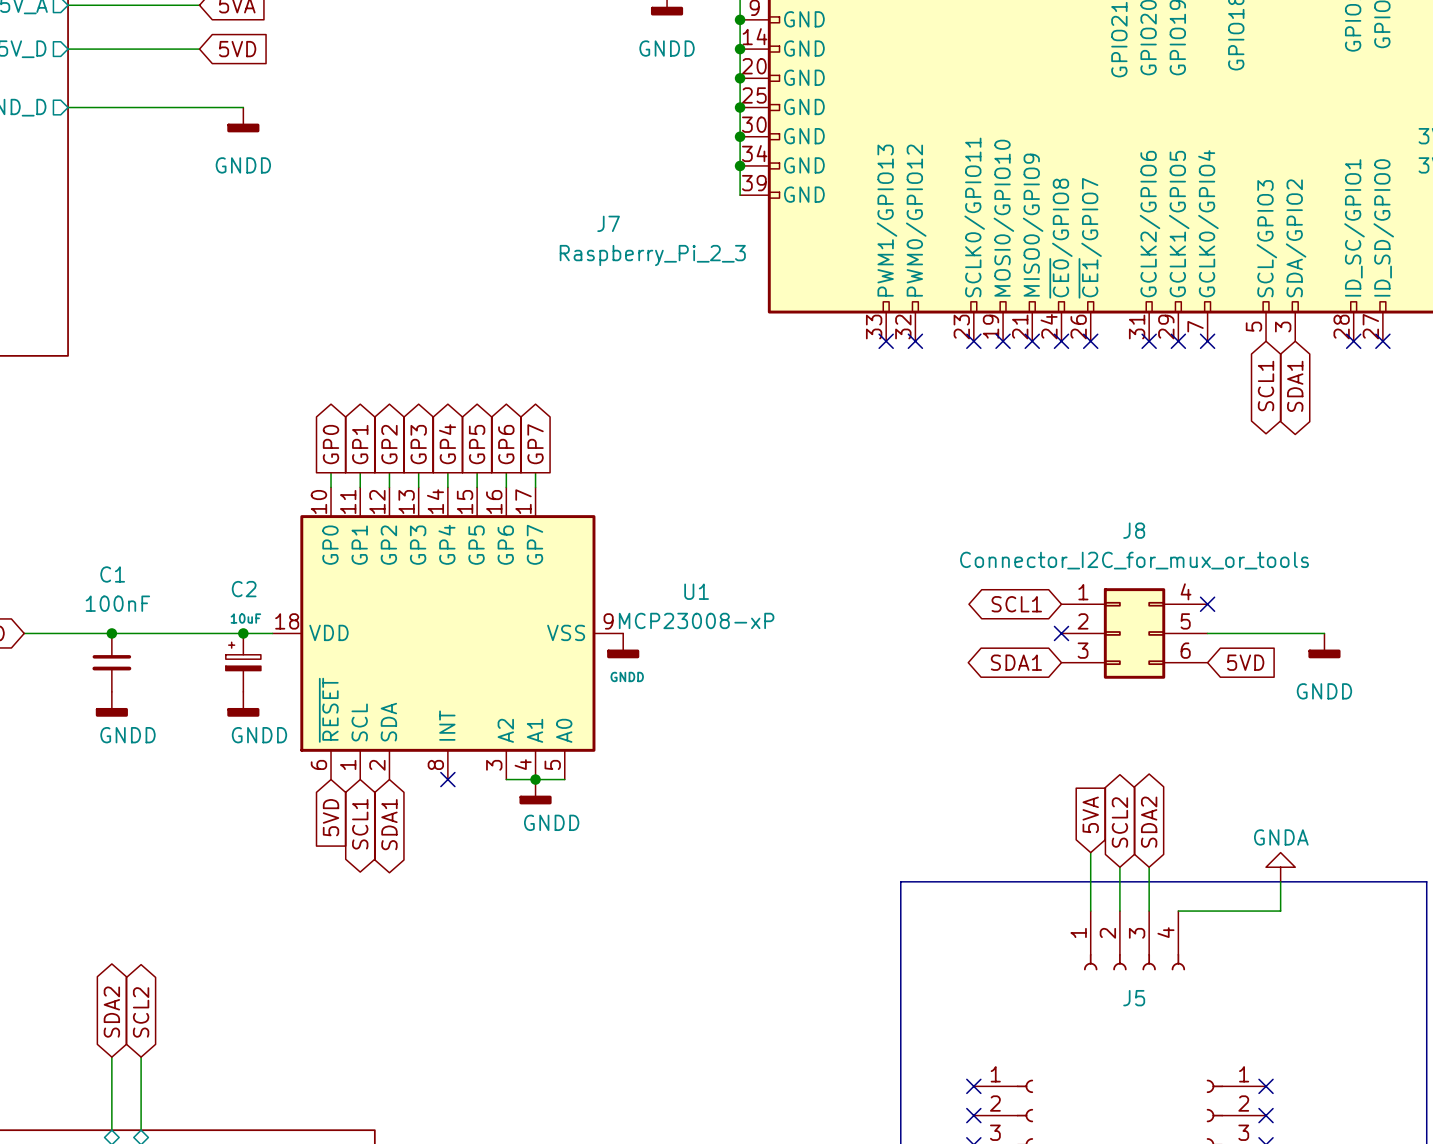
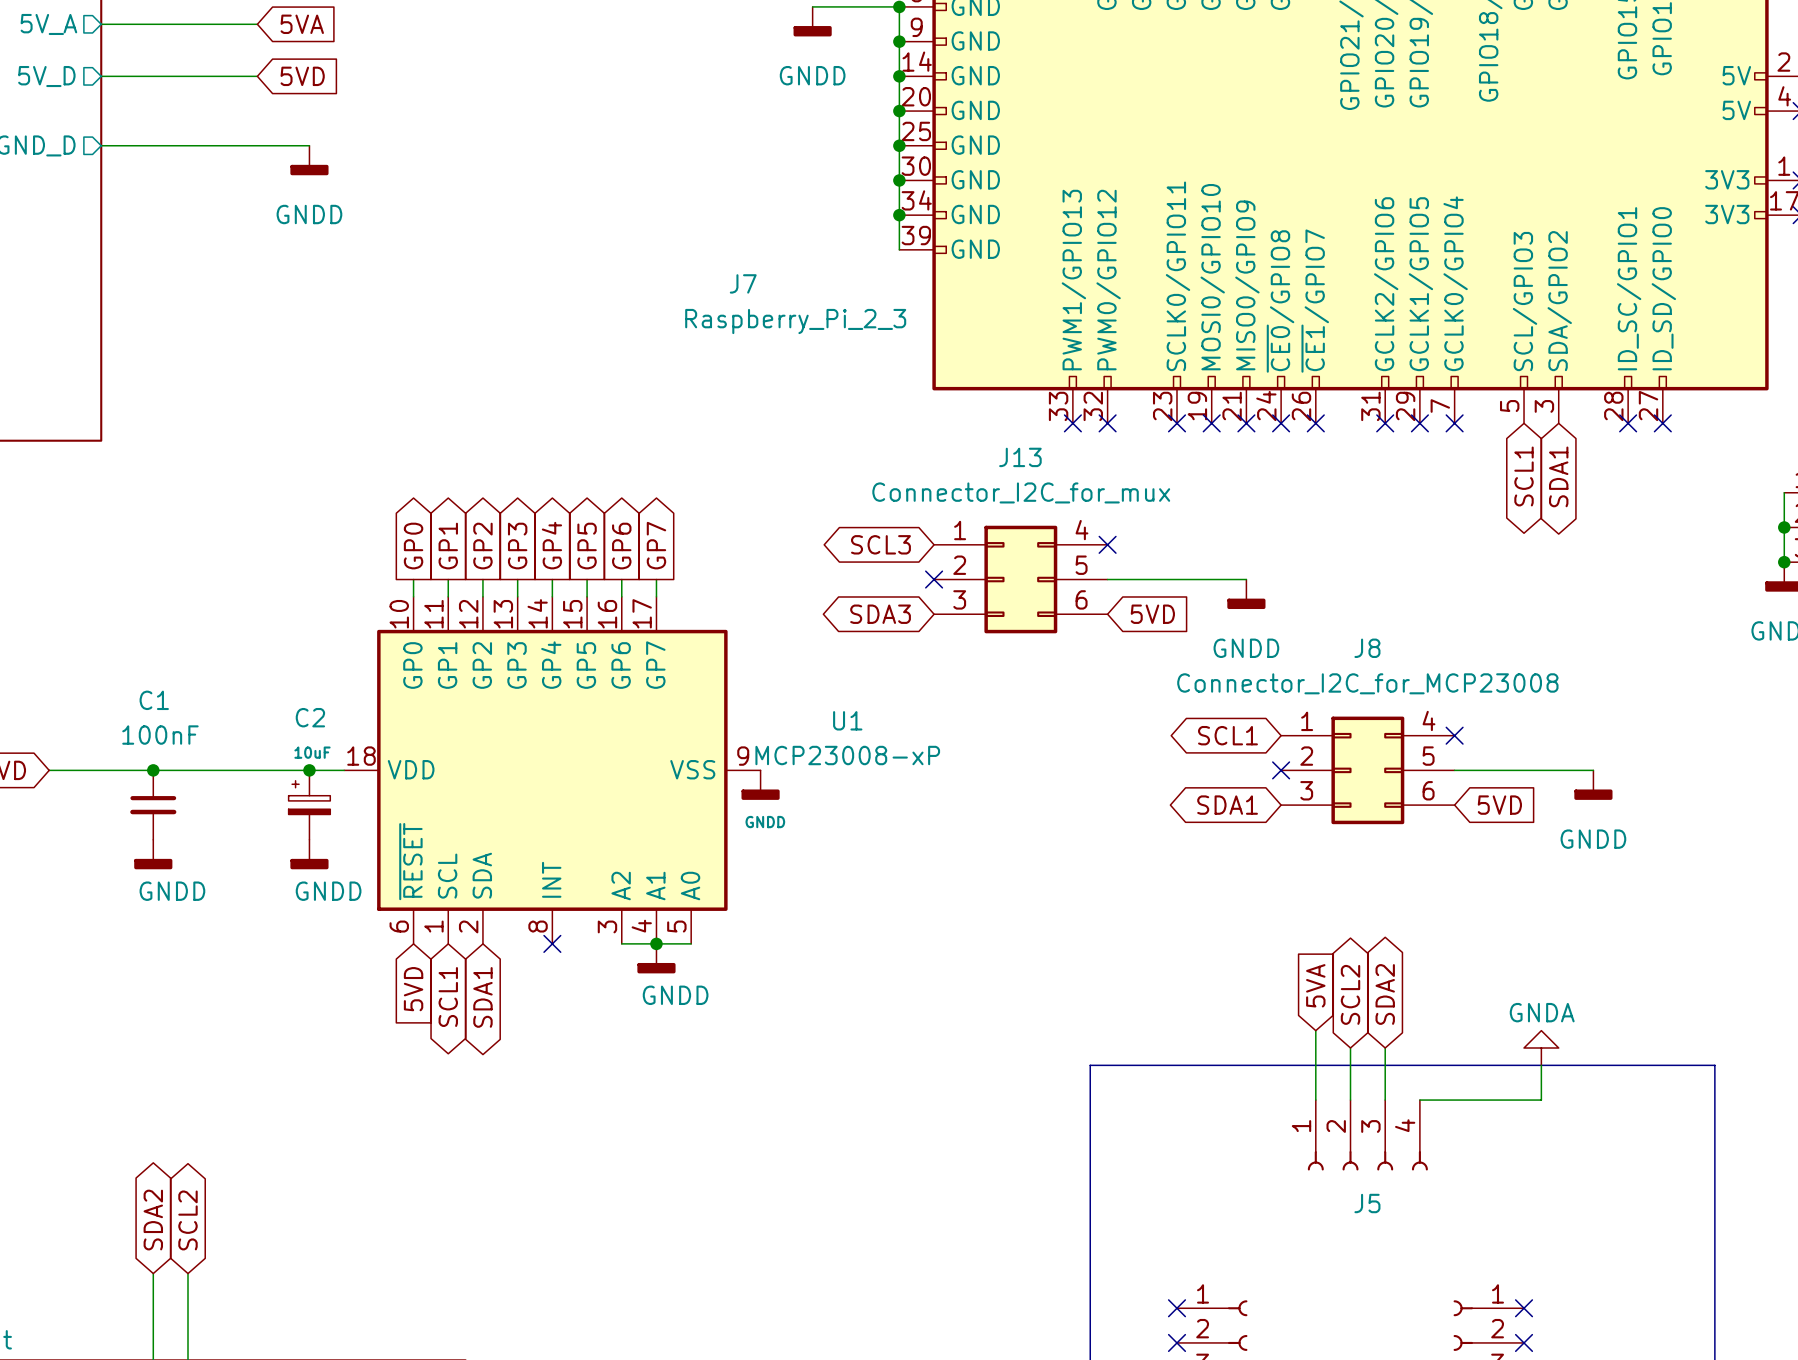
global label: none -> SCL3 (880, 544)
no-connect mark: none -> (1107, 544)
no-connect mark: none -> (934, 579)
J13: none -> Connector_I2C_for_mux (1020, 579)
wire: none -> (1107, 579) (1246, 579)
power symbol: none -> GNDD (1246, 594)
global label: none -> SDA3 (880, 614)
global label: none -> 5VD (1152, 614)
J8 value: Connector_I2C_for_mux_or_tools (1134, 560) -> Connector_I2C_for_MCP23008 (1367, 683)

